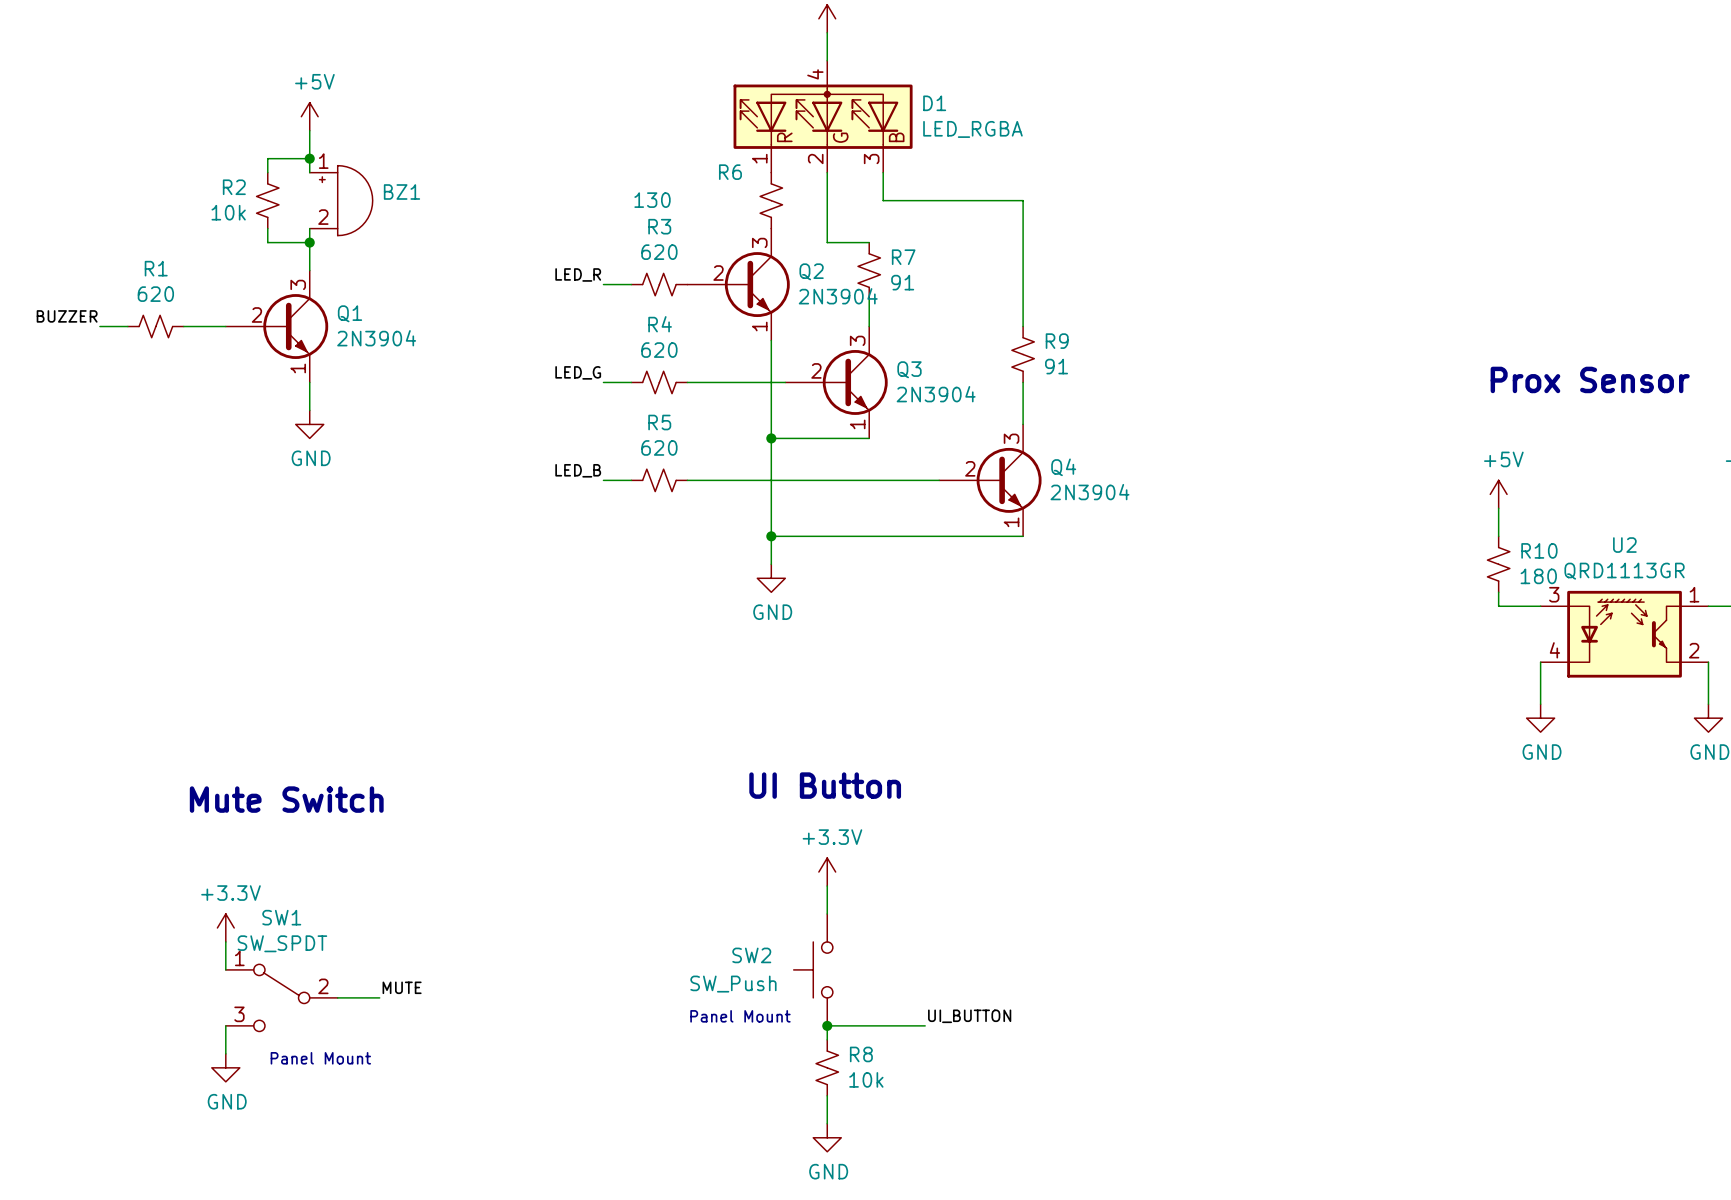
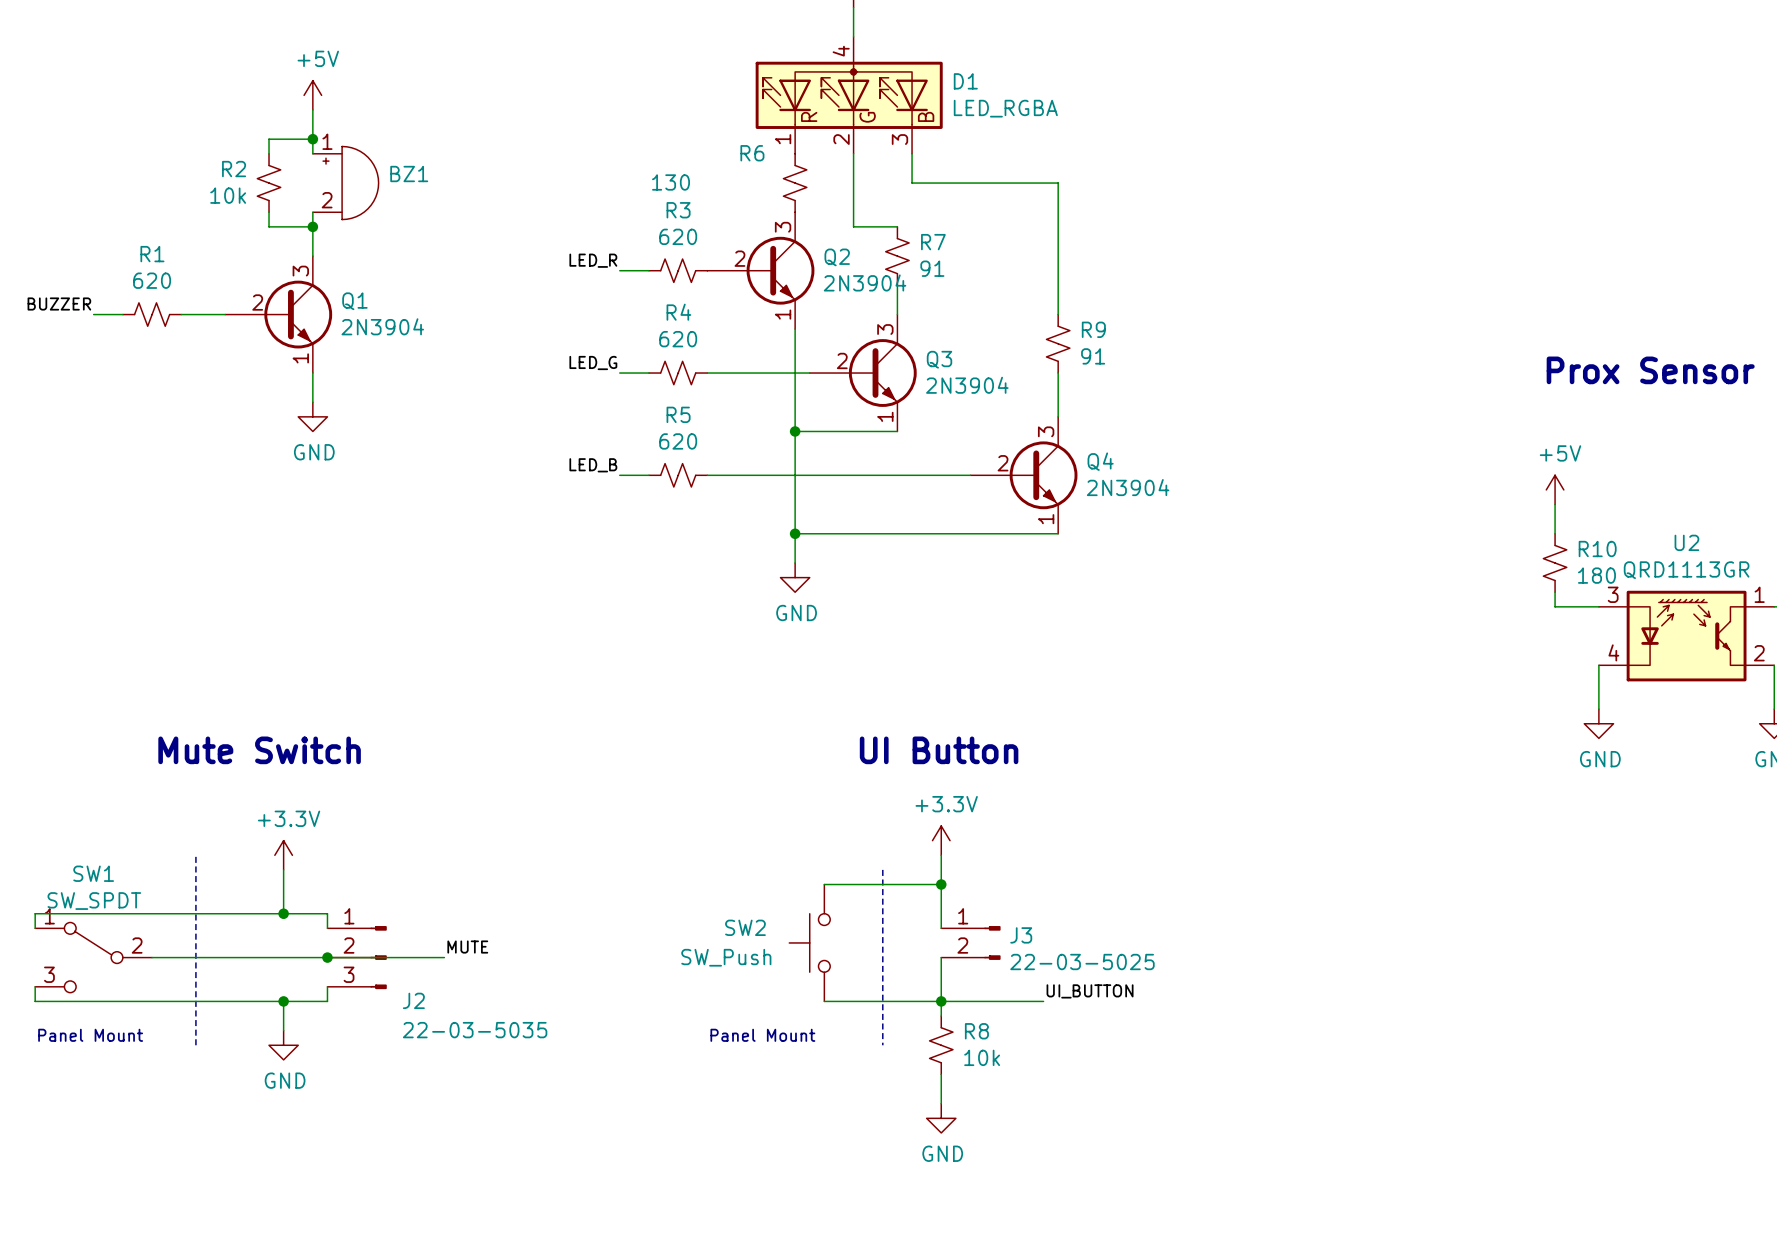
text position: UI Button (825, 785) -> UI Button (939, 750)
text position: Mute Switch (286, 799) -> Mute Switch (259, 750)
line: none -> (195, 855) (195, 1045)
wire: none -> (941, 855) (941, 928)
wire: none -> (283, 869) (283, 913)
line: none -> (882, 869) (882, 1045)
wire: none -> (824, 884) (941, 884)
power symbol position: +3.3V (827, 872) -> +3.3V (941, 840)
junction: none -> (941, 884)
wire: (827, 886) (827, 913) -> none
junction: none -> (283, 913)
wire: none -> (35, 928) (35, 913) (327, 913) (327, 928)
power symbol position: +3.3V (225, 927) -> +3.3V (283, 855)
J3: none -> 22-03-5025 (970, 942)
wire: none -> (152, 957) (444, 957)
wire: (225, 941) (225, 969) -> (283, 1001) (283, 1030)
junction: none -> (327, 957)
J2: none -> 22-03-5035 (357, 957)
wire: none -> (941, 957) (941, 1016)
wire: none -> (35, 986) (35, 1001) (327, 1001) (327, 986)
SW2 position: (813, 969) -> (809, 942)
junction: none -> (283, 1001)
wire: none -> (824, 1001) (1043, 1001)
junction: none -> (941, 1001)
label position: MUTE (402, 987) -> MUTE (467, 947)
SW1 position: (281, 997) -> (93, 957)
wire: (337, 997) (379, 997) -> none
label position: UI_BUTTON (969, 1016) -> UI_BUTTON (1090, 991)
wire: (225, 1025) (225, 1053) -> none
junction: (827, 1025) -> none
wire: (925, 1025) (827, 1025) (827, 1039) -> none
text position: Panel Mount (320, 1058) -> Panel Mount (90, 1035)
power symbol position: GND (225, 1067) -> GND (283, 1045)
R8 position: (827, 1067) -> (941, 1045)
wire: (827, 1095) (827, 1123) -> (941, 1074) (941, 1103)
power symbol position: GND (827, 1137) -> GND (941, 1118)

